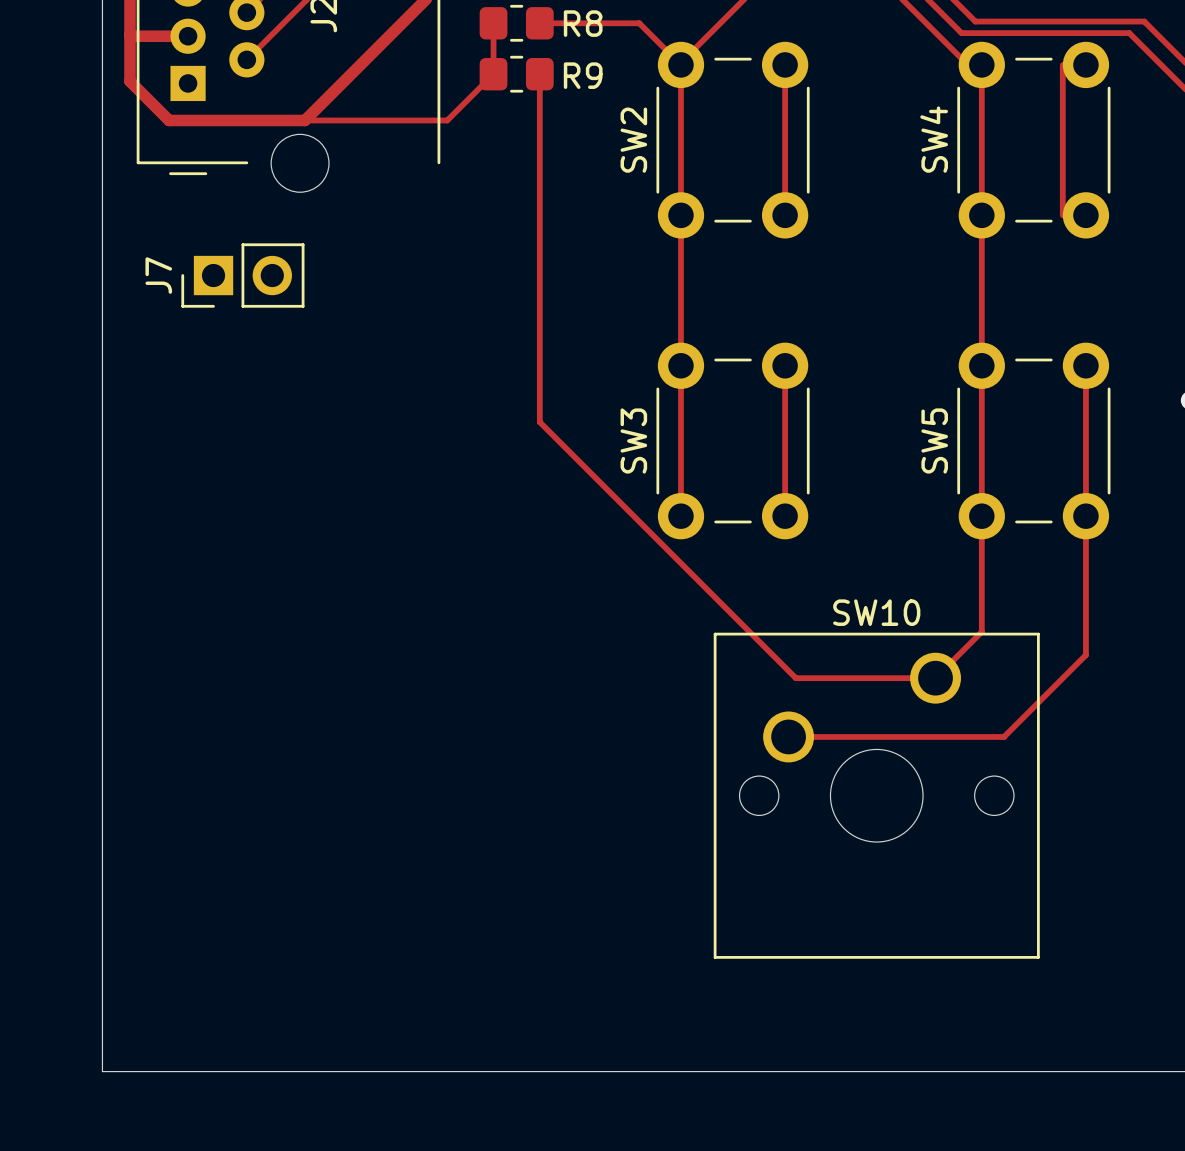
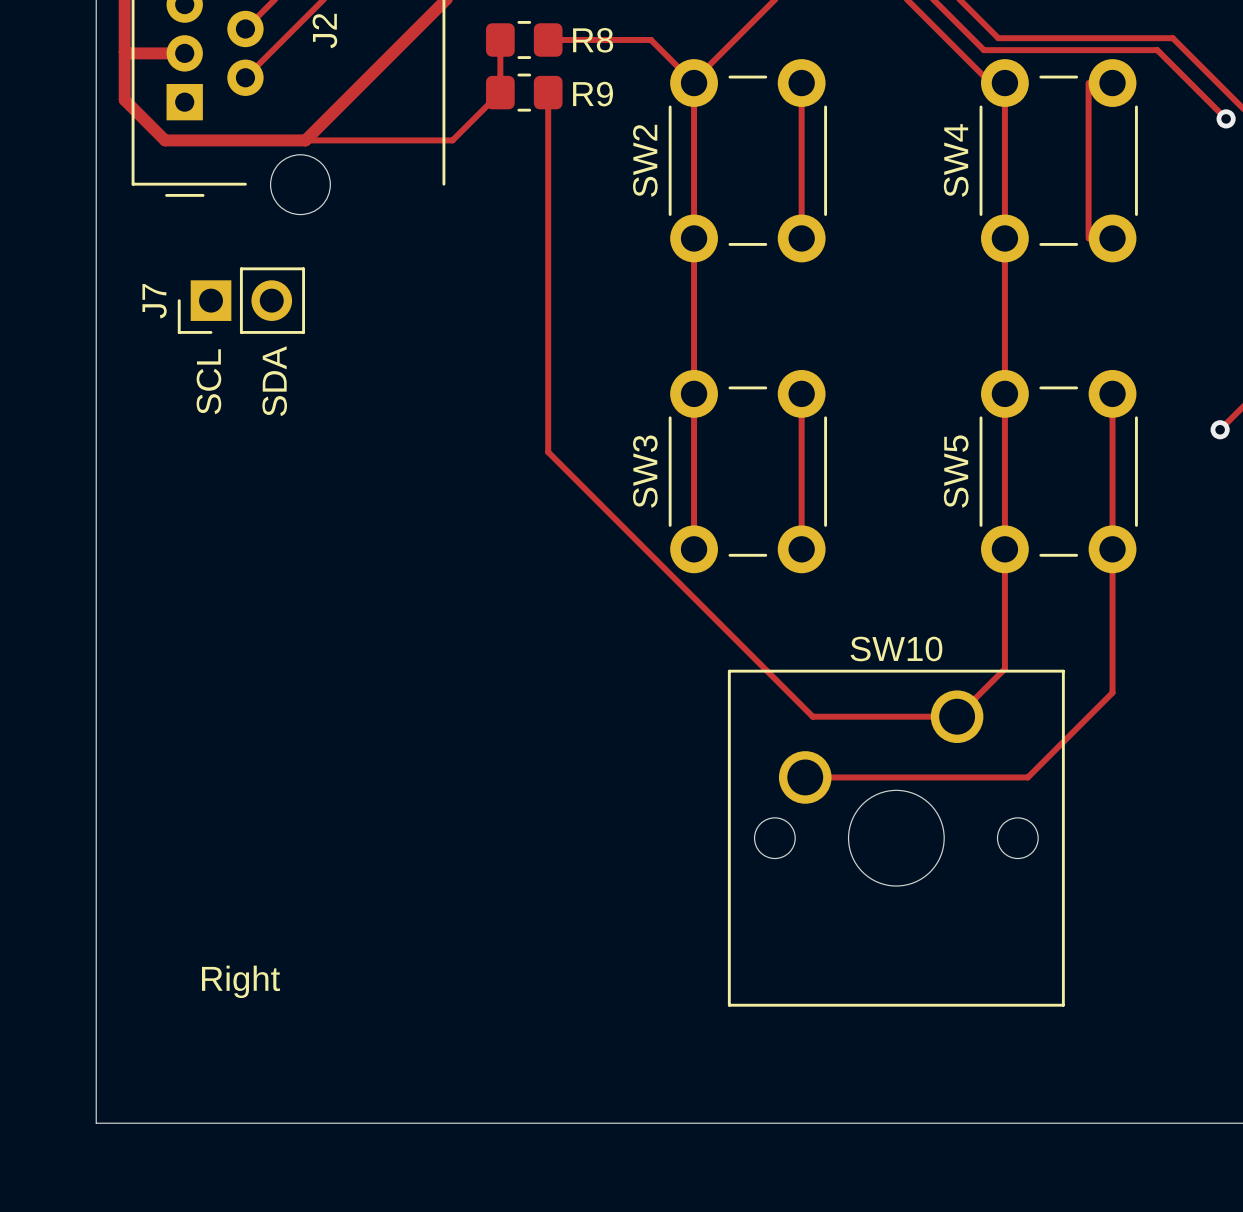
text: none -> SCL (208, 381)
text: none -> SDA (274, 381)
text: none -> Right (241, 981)

